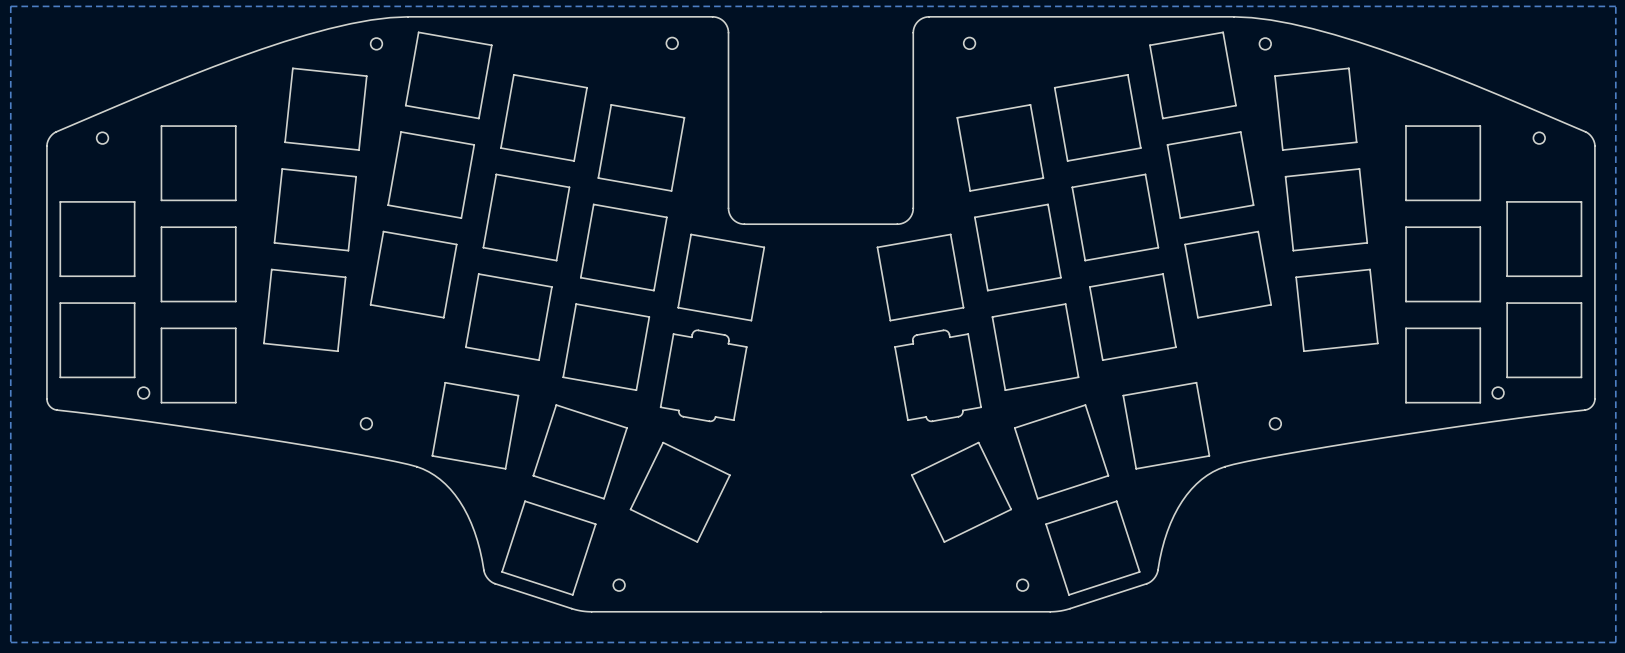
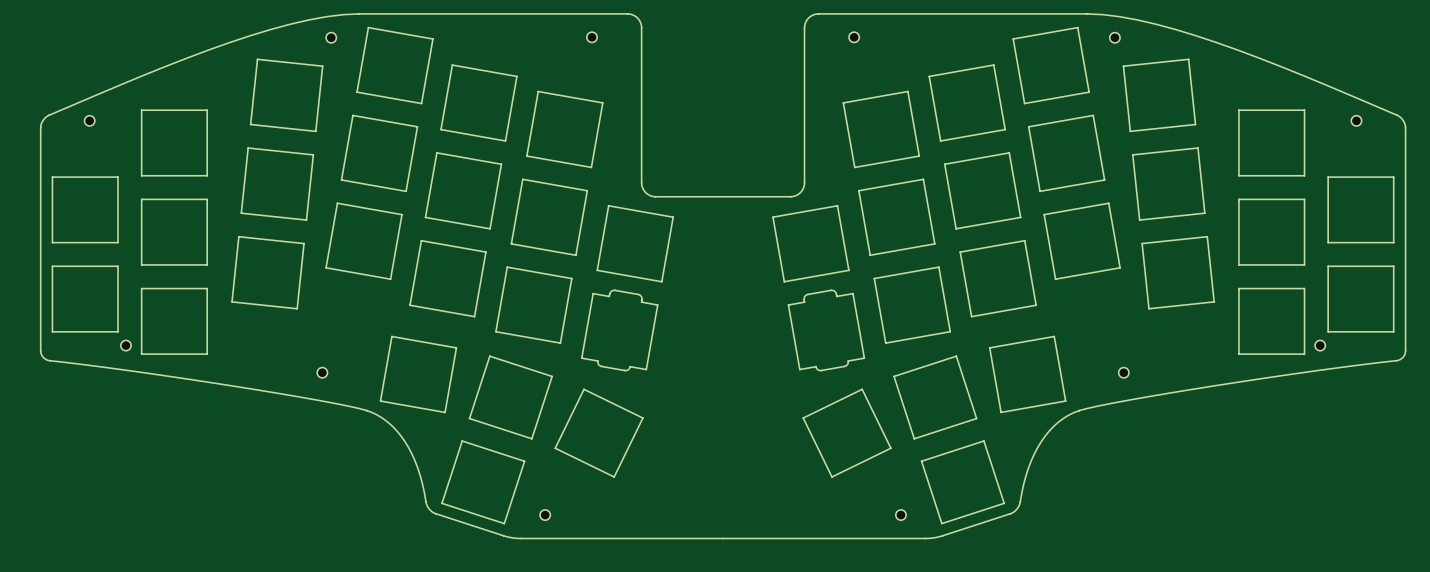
zone outline: (1615, 6) (1615, 642) (10, 642) (10, 6) (1615, 6) -> none

